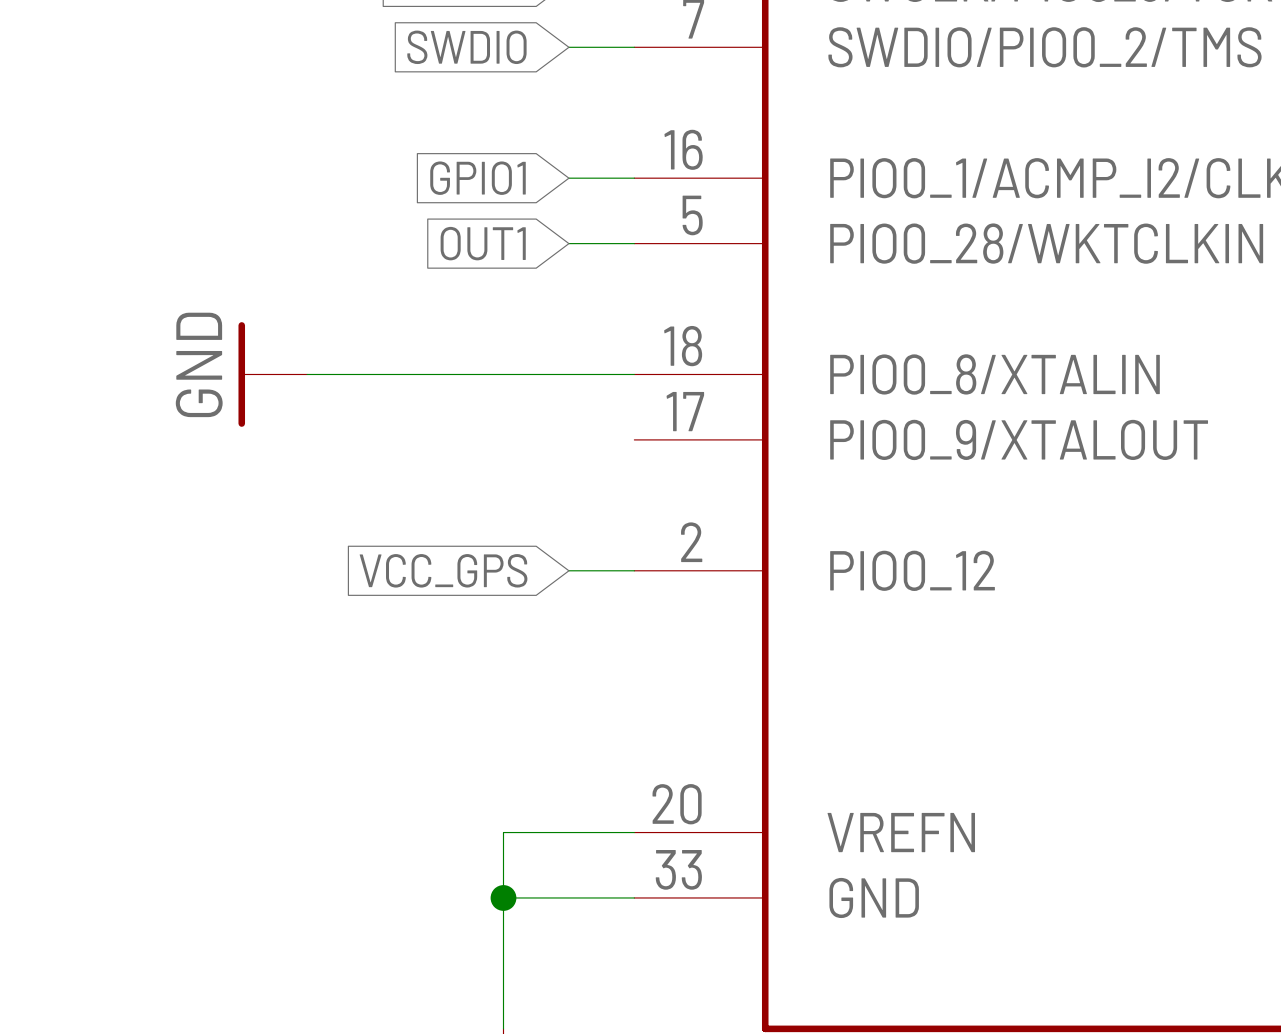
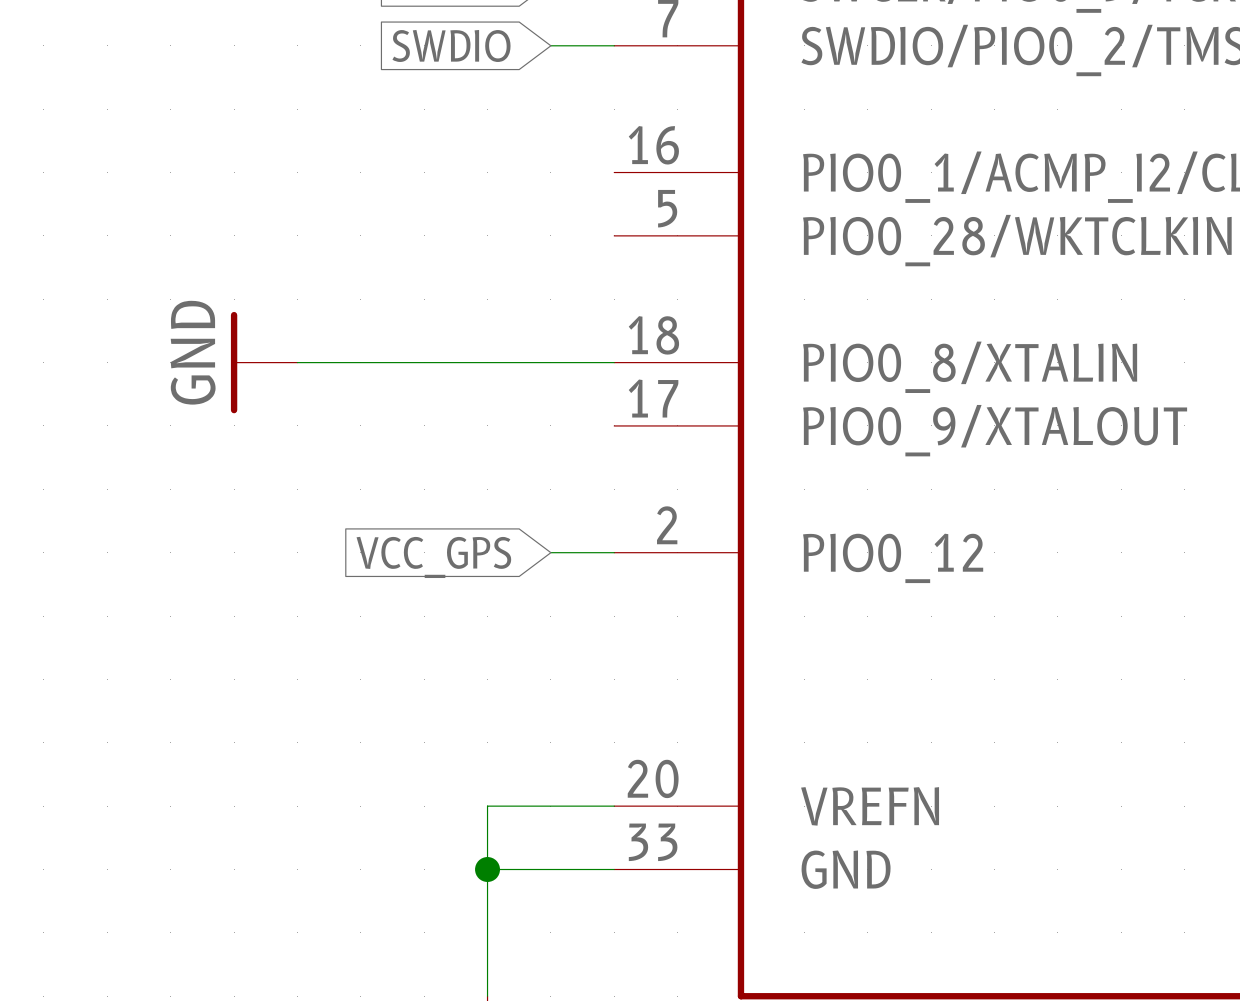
global label: GPIO1 (477, 178) -> none
wire: (568, 178) (634, 178) -> none
global label: OUT1 (483, 243) -> none
wire: (568, 243) (634, 243) -> none

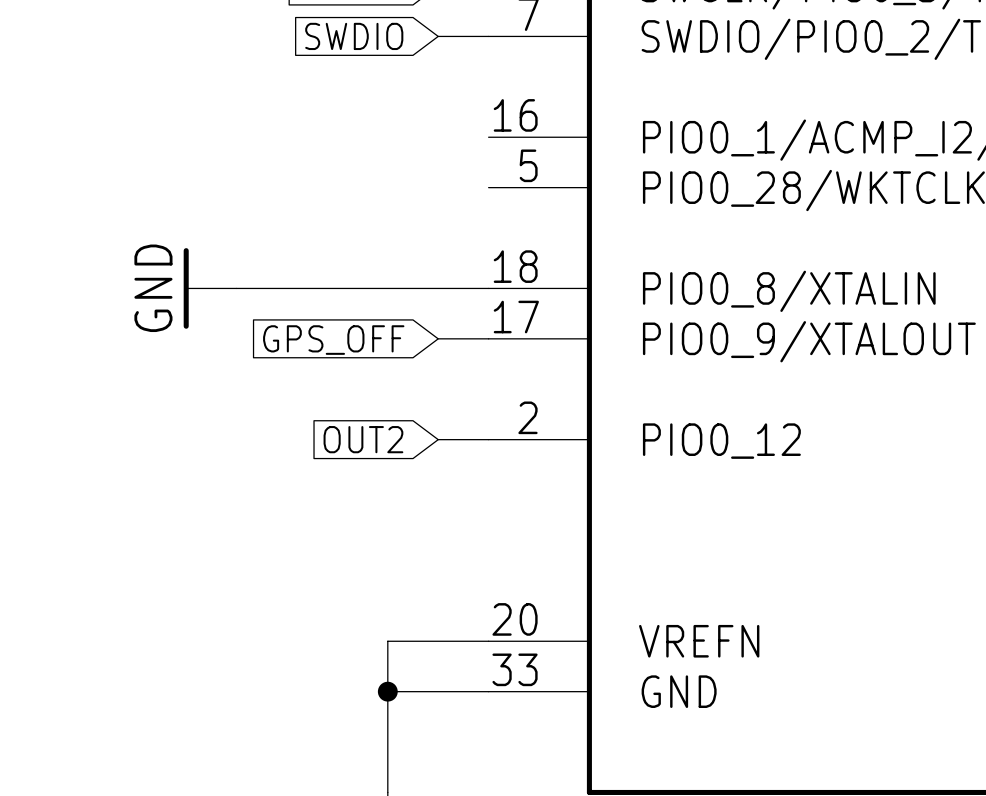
wire: none -> (438, 338) (488, 338)
global label: none -> GPS_OFF (333, 340)
global label: VCC_GPS (433, 557) -> OUT2 (363, 439)

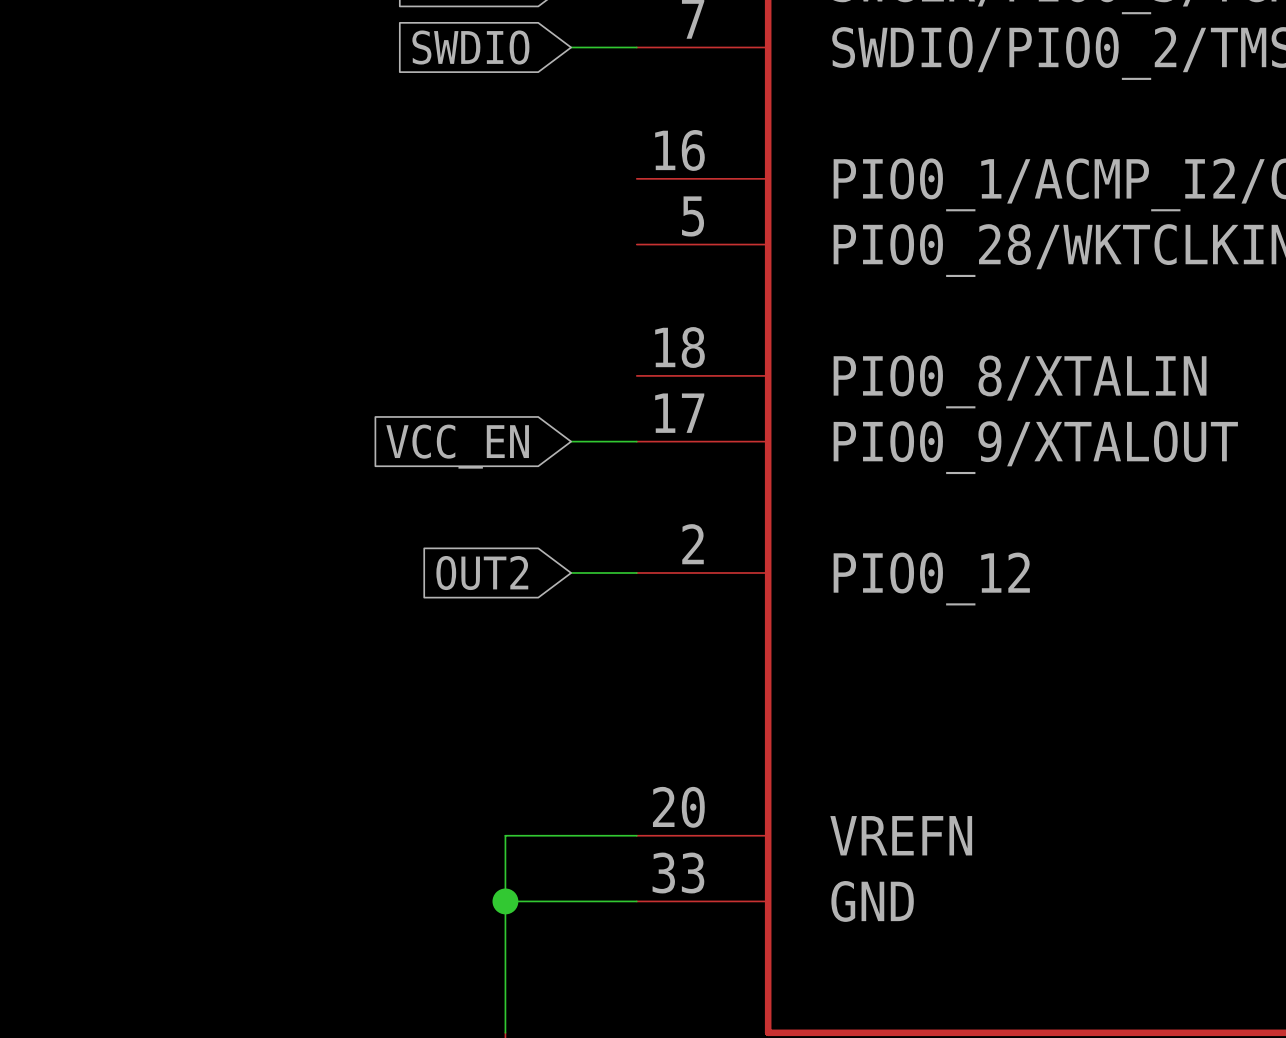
power symbol: GND (210, 288) -> none
wire: (236, 288) (488, 288) -> none
global label: GPS_OFF (333, 340) -> VCC_EN (457, 446)

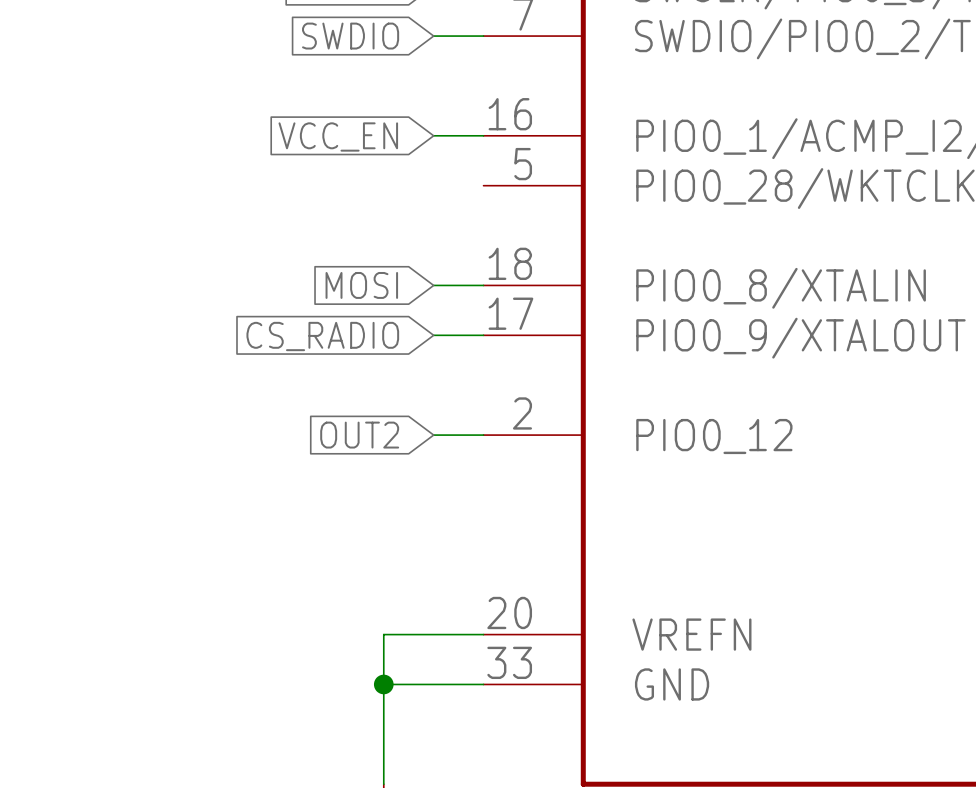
wire: none -> (433, 135) (483, 135)
global label: none -> VCC_EN (338, 136)
global label: none -> MOSI (361, 285)
wire: none -> (433, 285) (483, 285)
global label: VCC_EN (457, 446) -> CS_RADIO (322, 336)

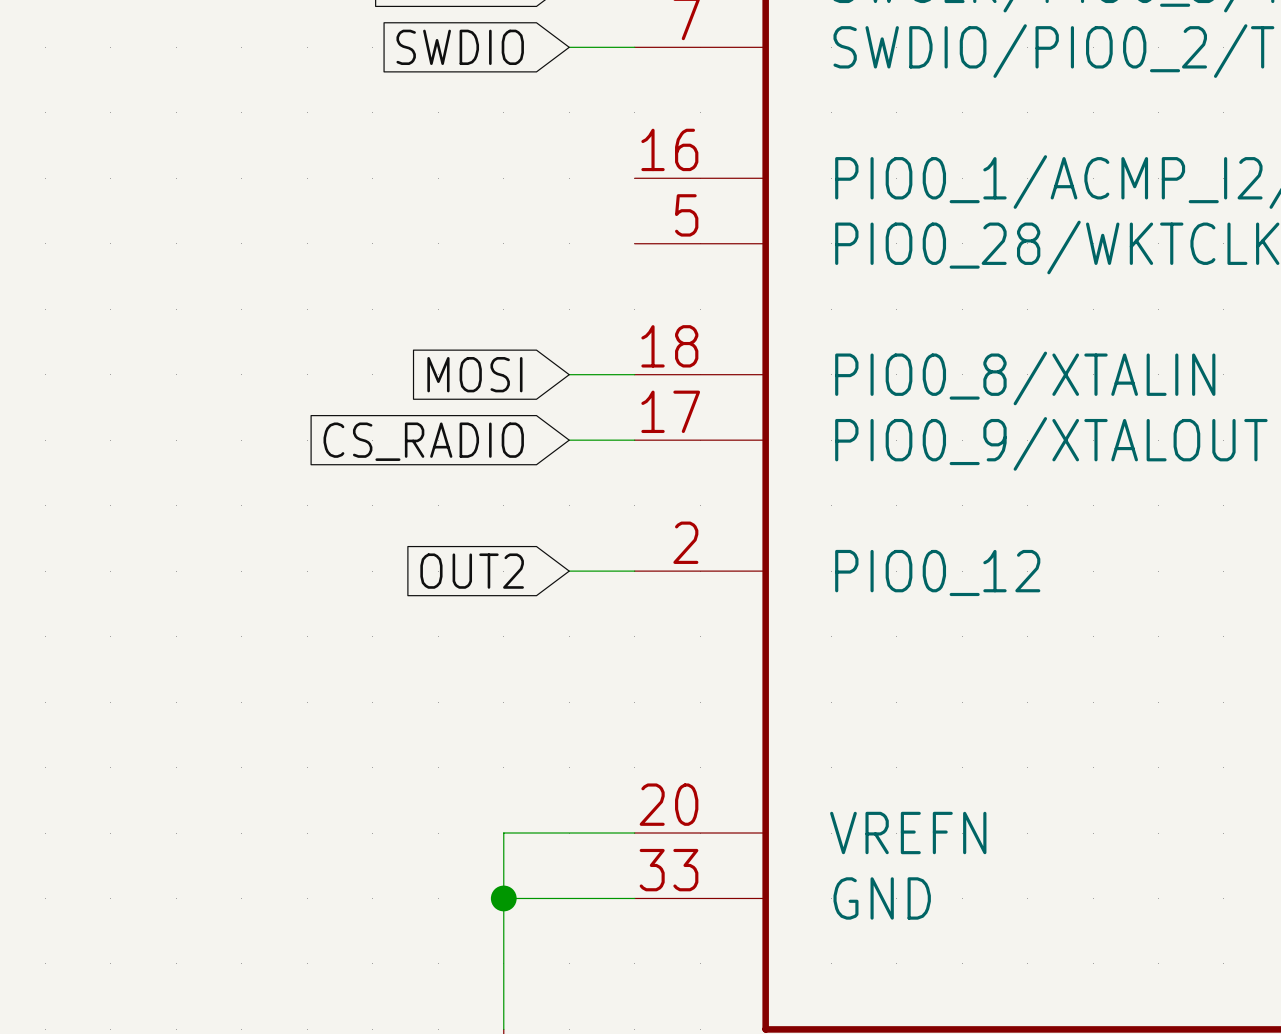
wire: (433, 135) (483, 135) -> none
global label: VCC_EN (338, 136) -> none

